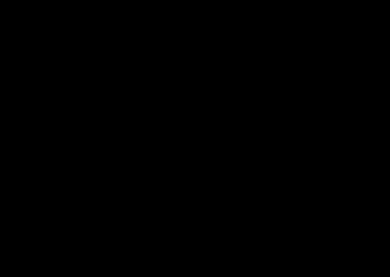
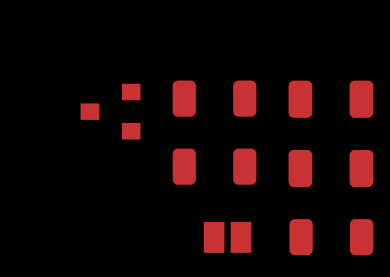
part: none -> (214, 98)
part: none -> (330, 99)
part: none -> (110, 111)
part: none -> (214, 166)
part: none -> (330, 168)
part: none -> (227, 237)
part: none -> (331, 237)

